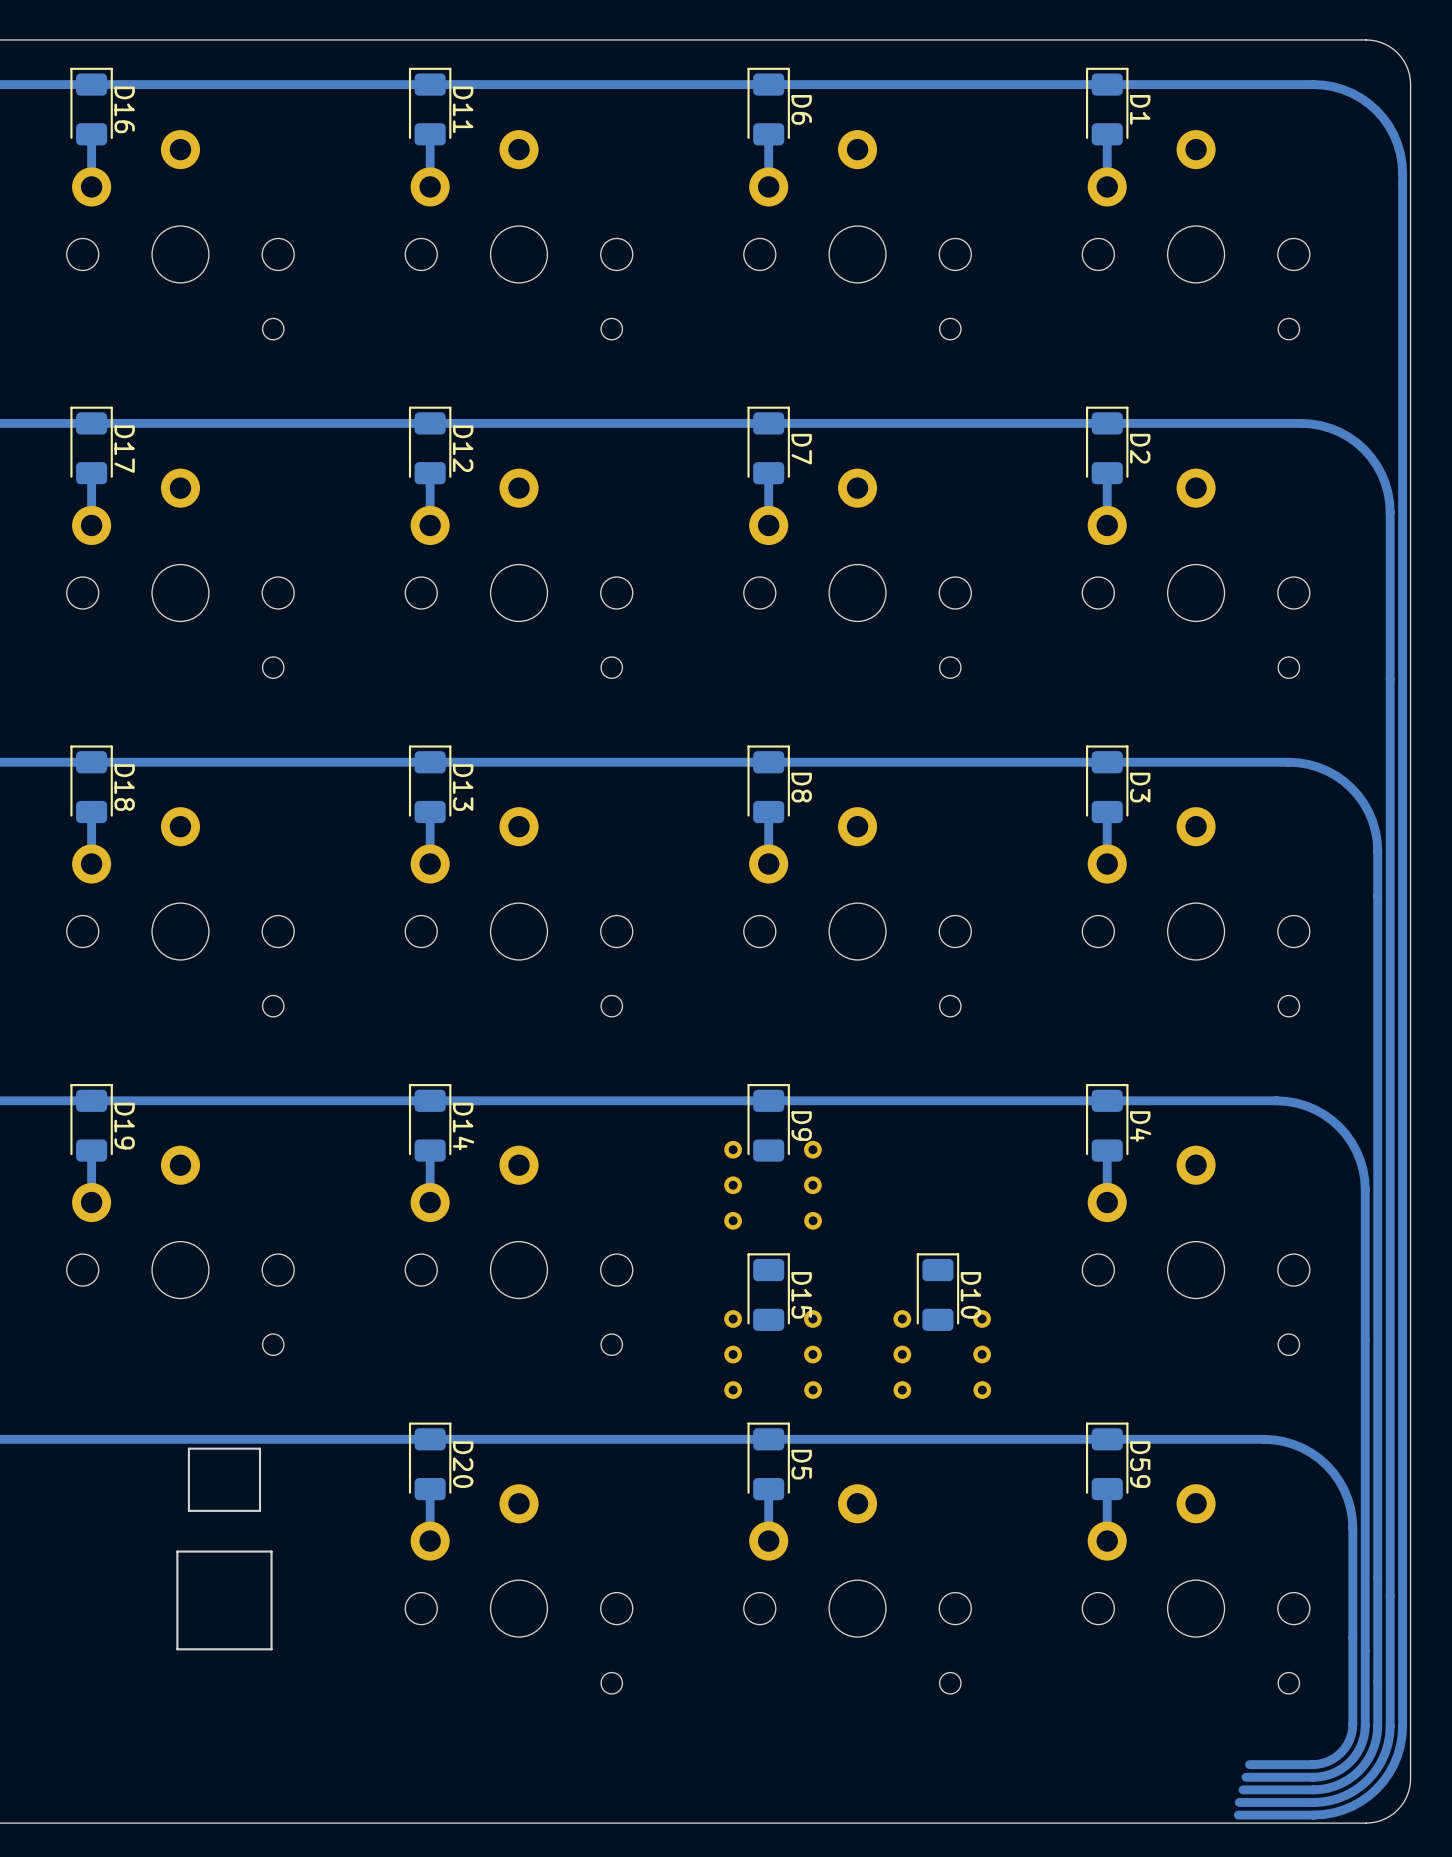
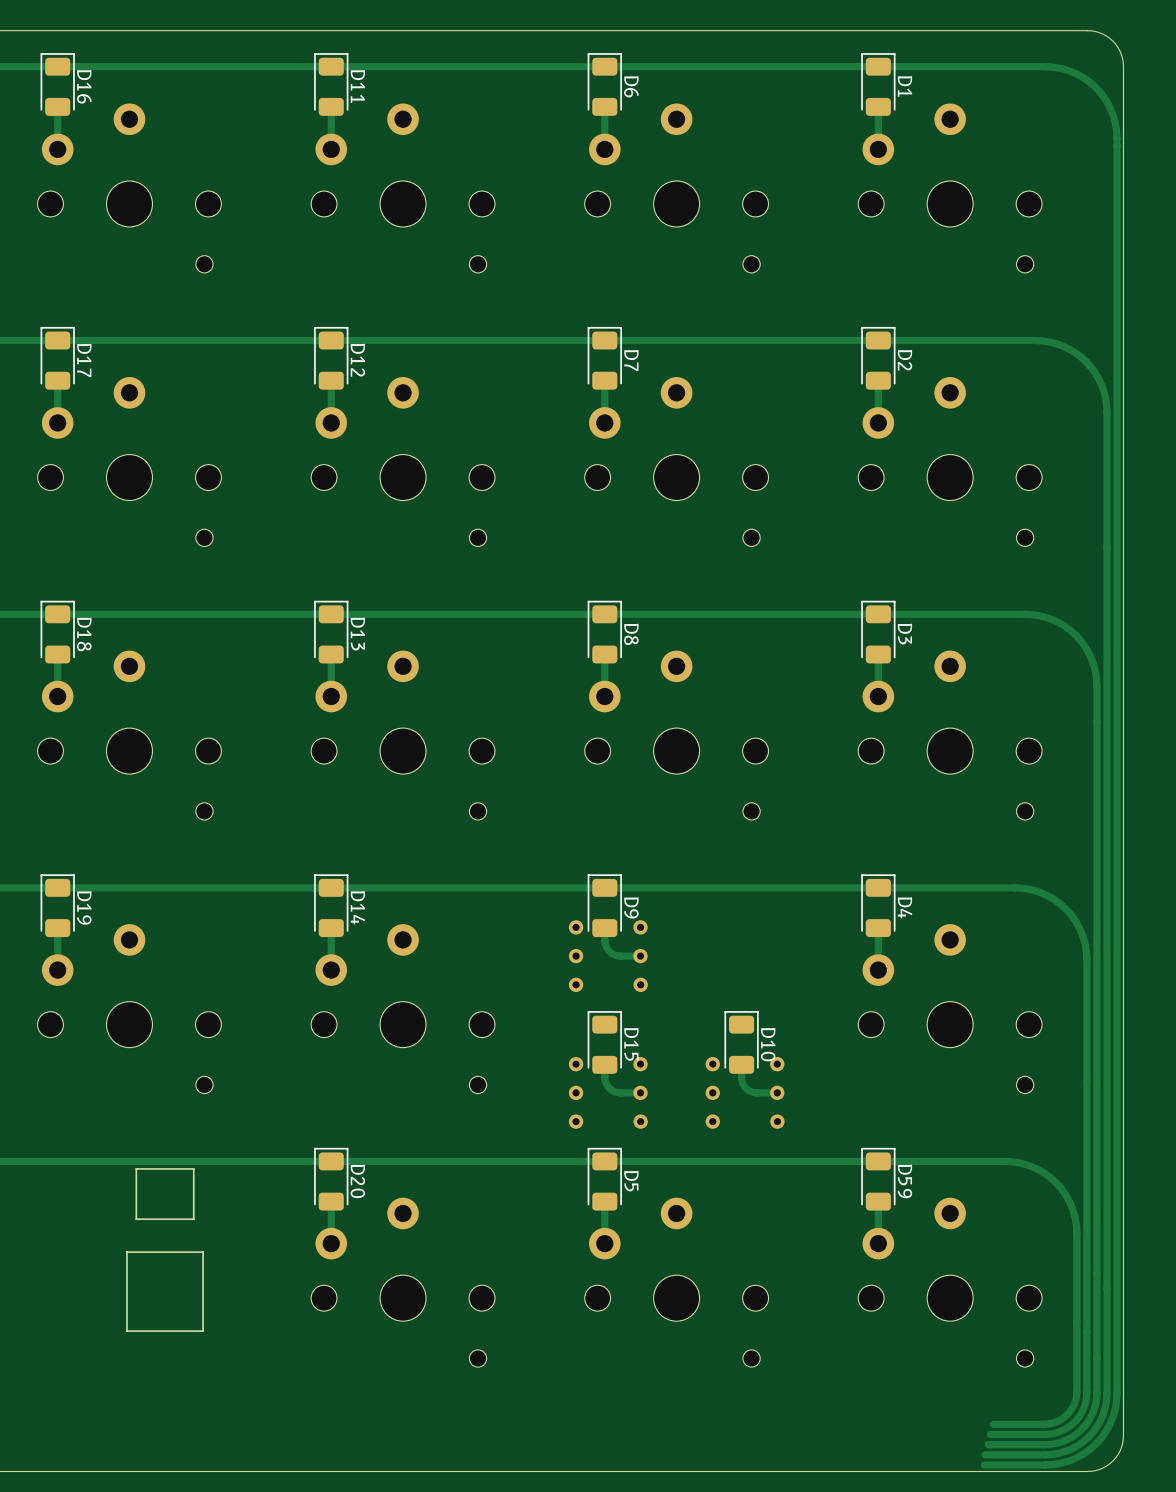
track: none -> (604, 928) (605, 943) (610, 952) (619, 956) (640, 956)
track: none -> (604, 1064) (605, 1080) (610, 1089) (618, 1092) (640, 1092)
track: none -> (741, 1064) (741, 1080) (747, 1089) (755, 1092) (777, 1092)

